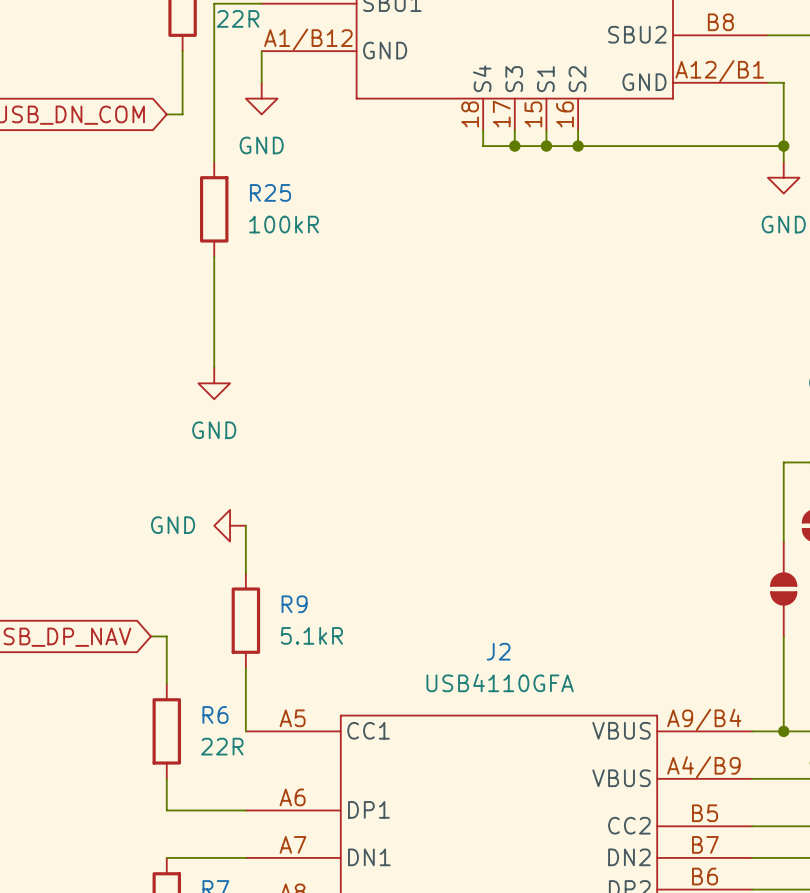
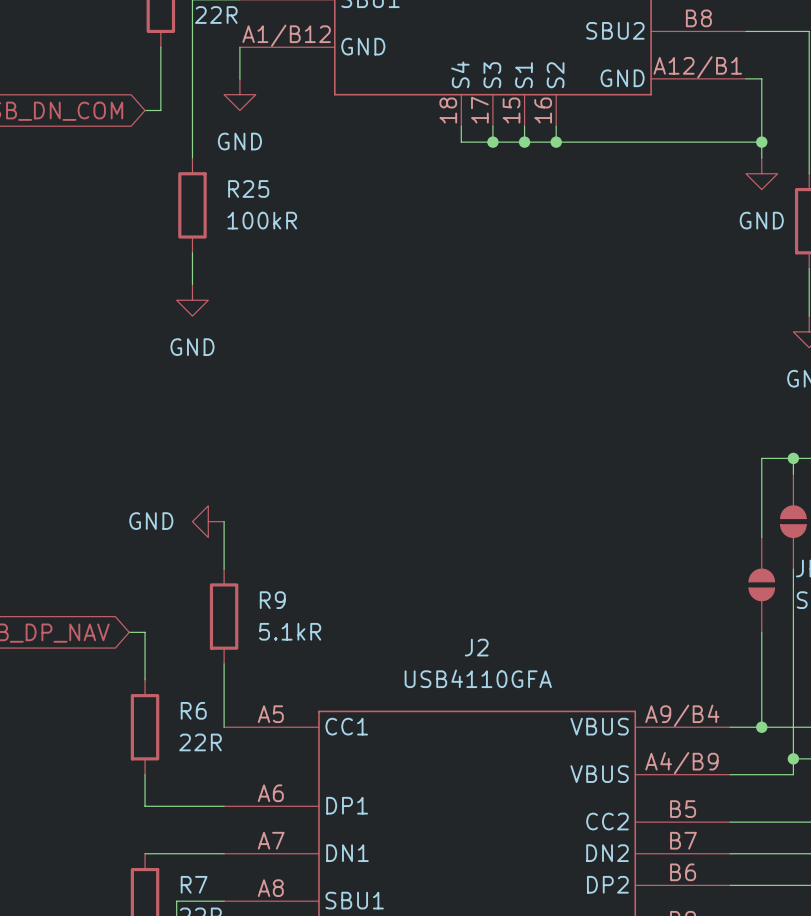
wire: (214, 288) (214, 367) -> none
power symbol position: GND (214, 383) -> GND (192, 300)

